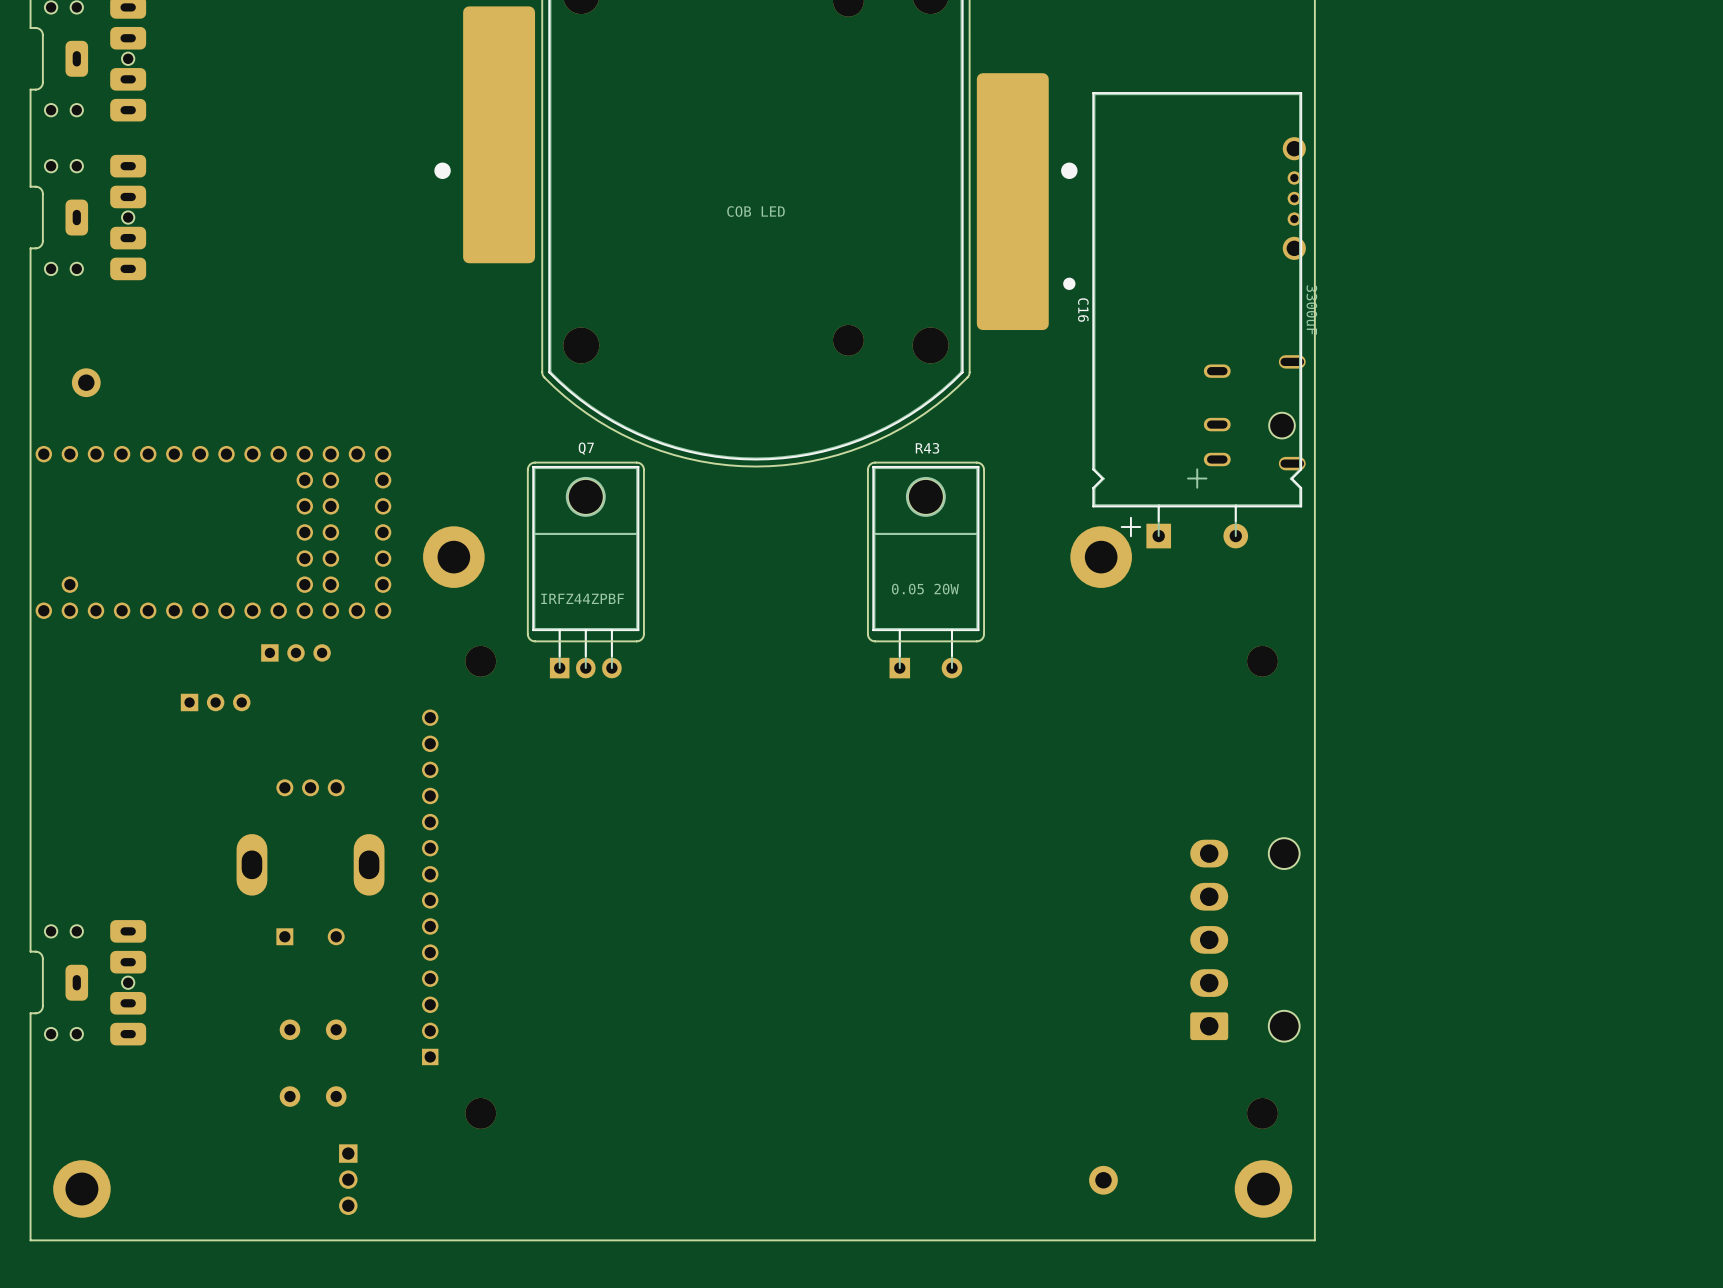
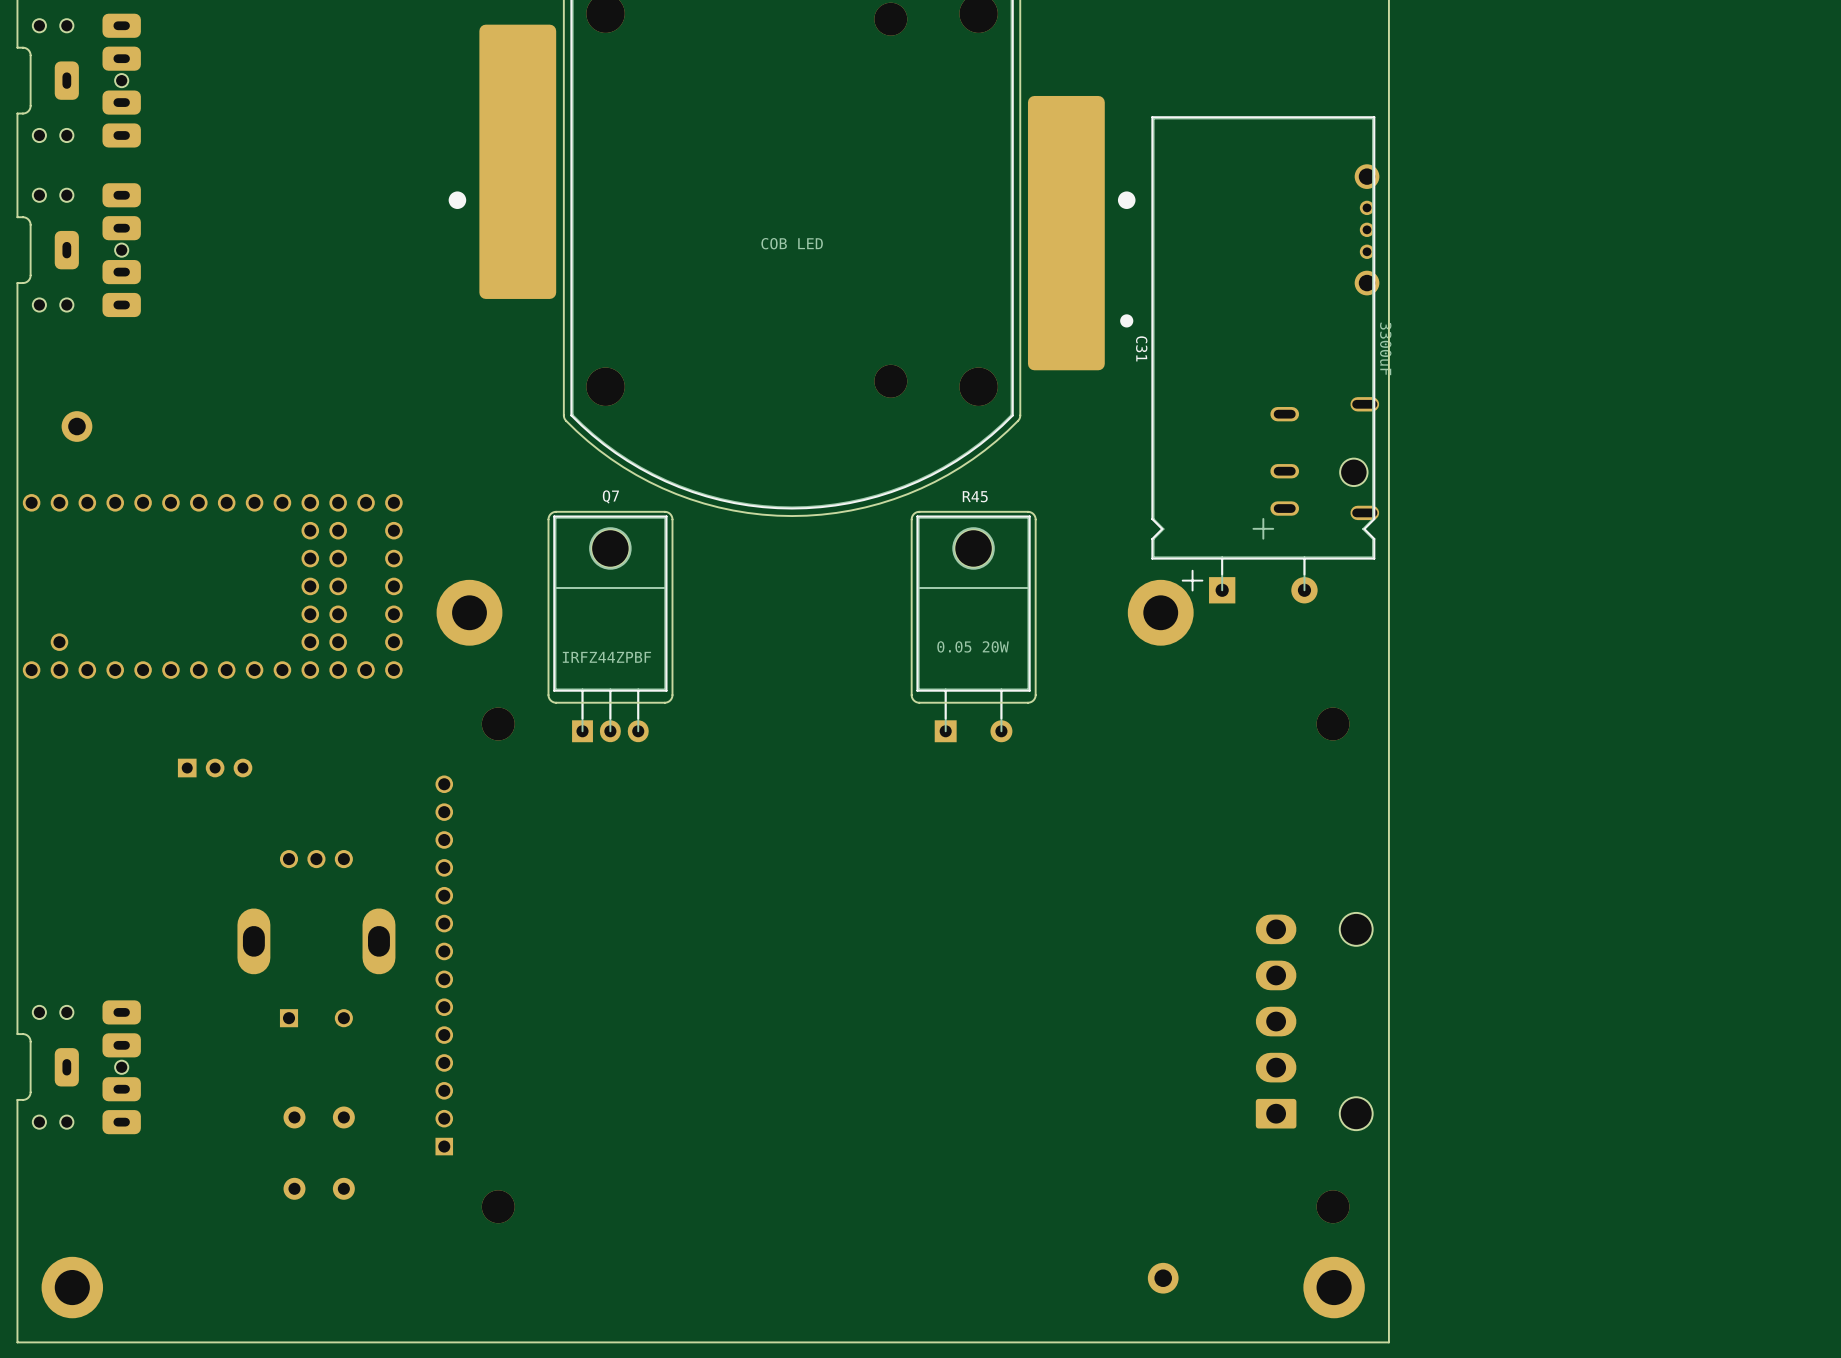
C16 name: C16 (1083, 310) -> C31 (1141, 348)
R43 name: R43 (927, 448) -> R45 (975, 496)
part: (295, 652) -> none
part: (348, 1179) -> none

